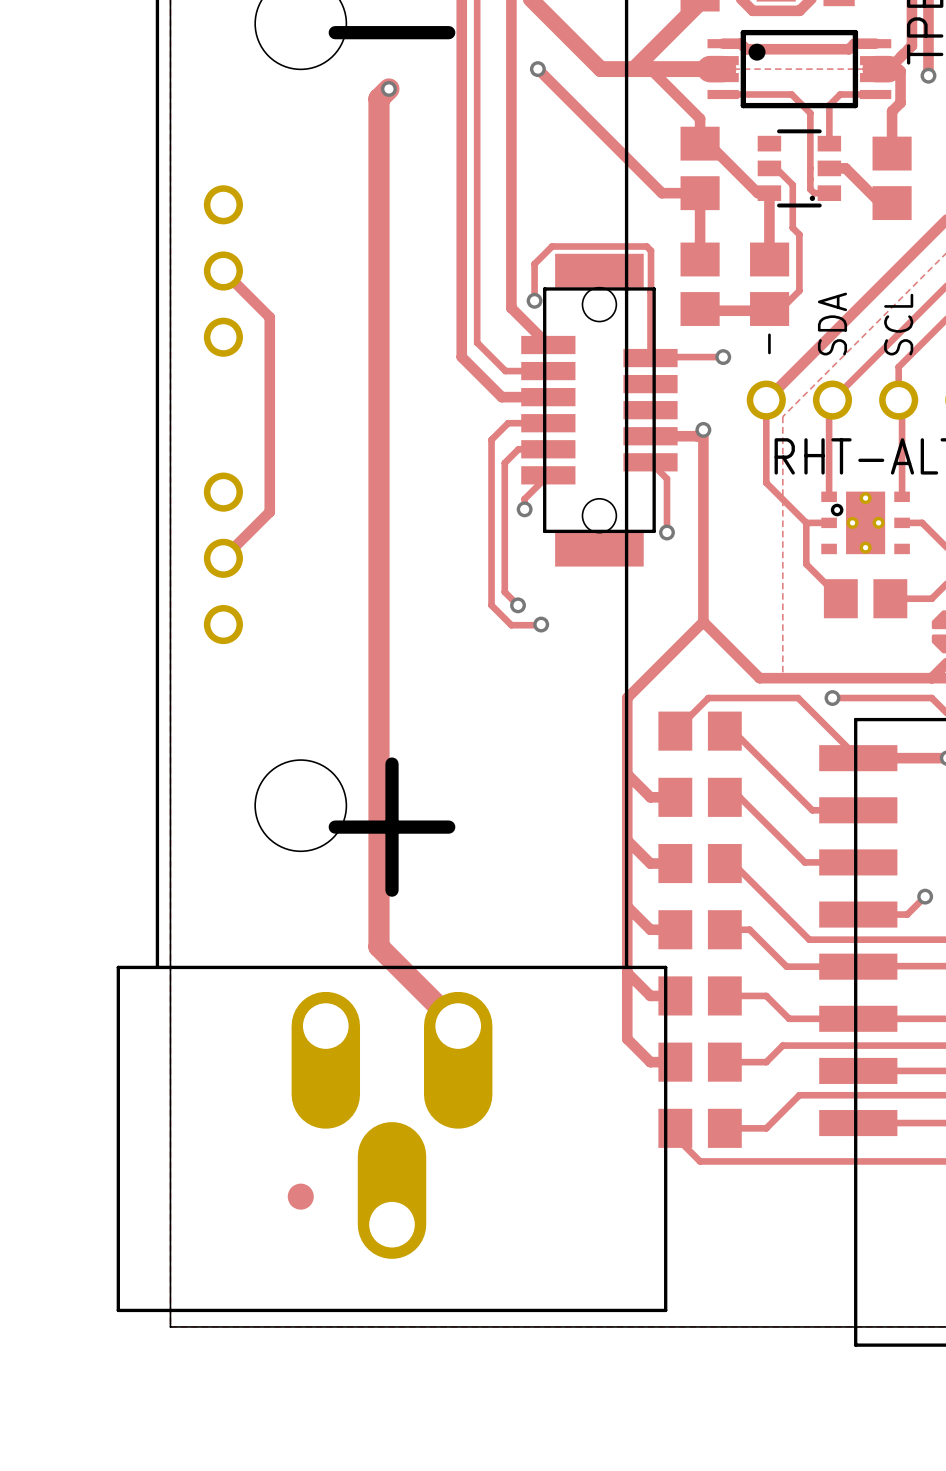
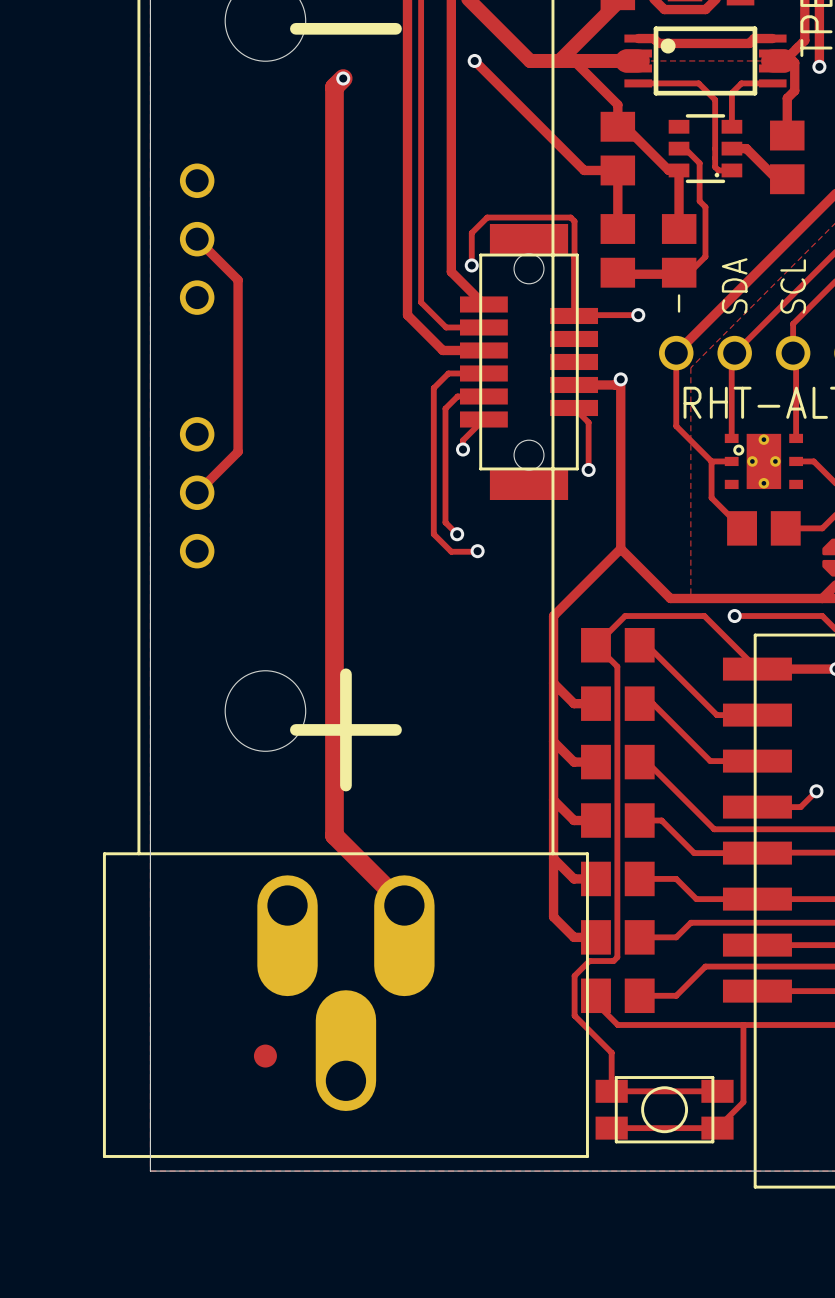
track: none -> (595, 645) (617, 666) (617, 957) (613, 961) (589, 961) (574, 975) (574, 1015) (611, 1052) (611, 1091) (717, 1091)
track: none -> (743, 1025) (743, 1102) (717, 1128) (611, 1128)
part: none -> (664, 1109)

